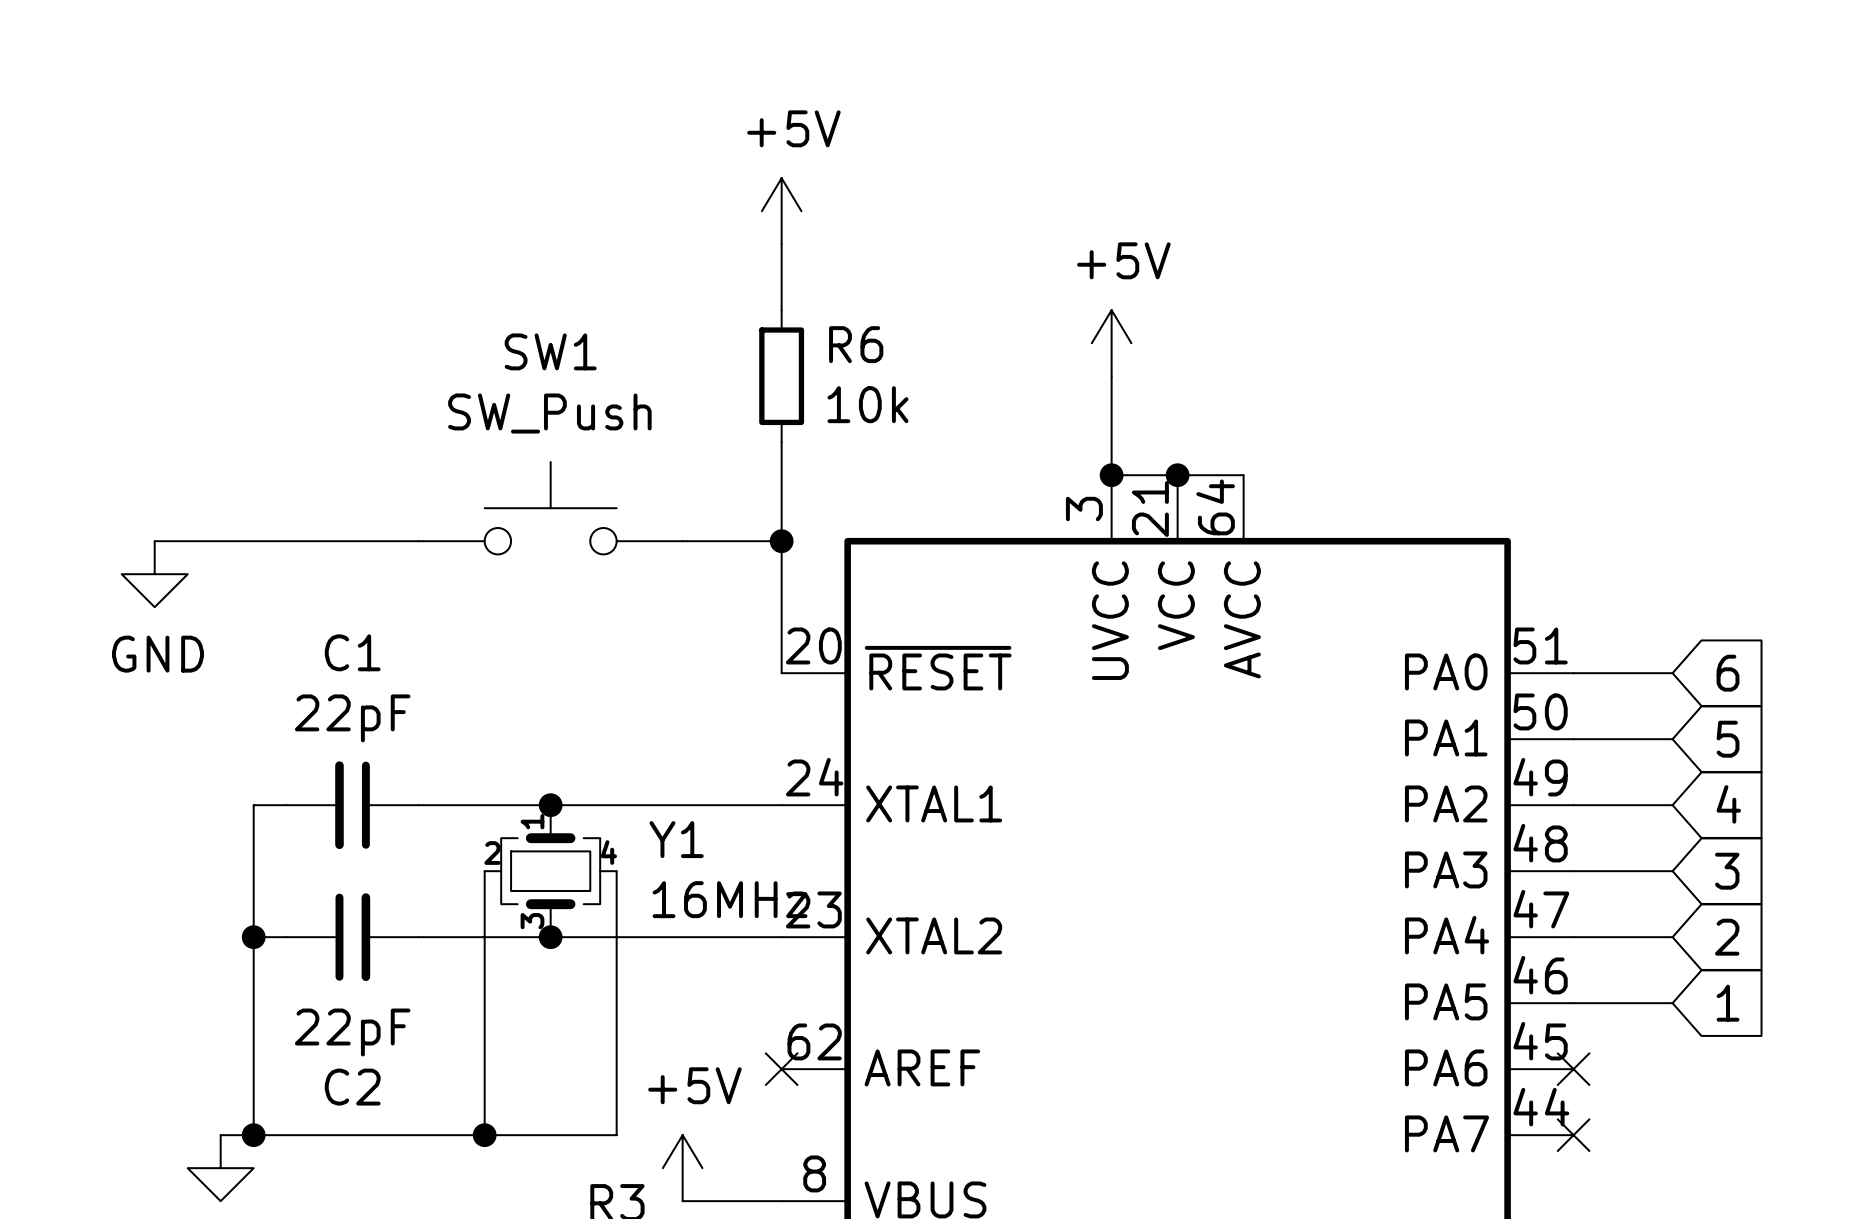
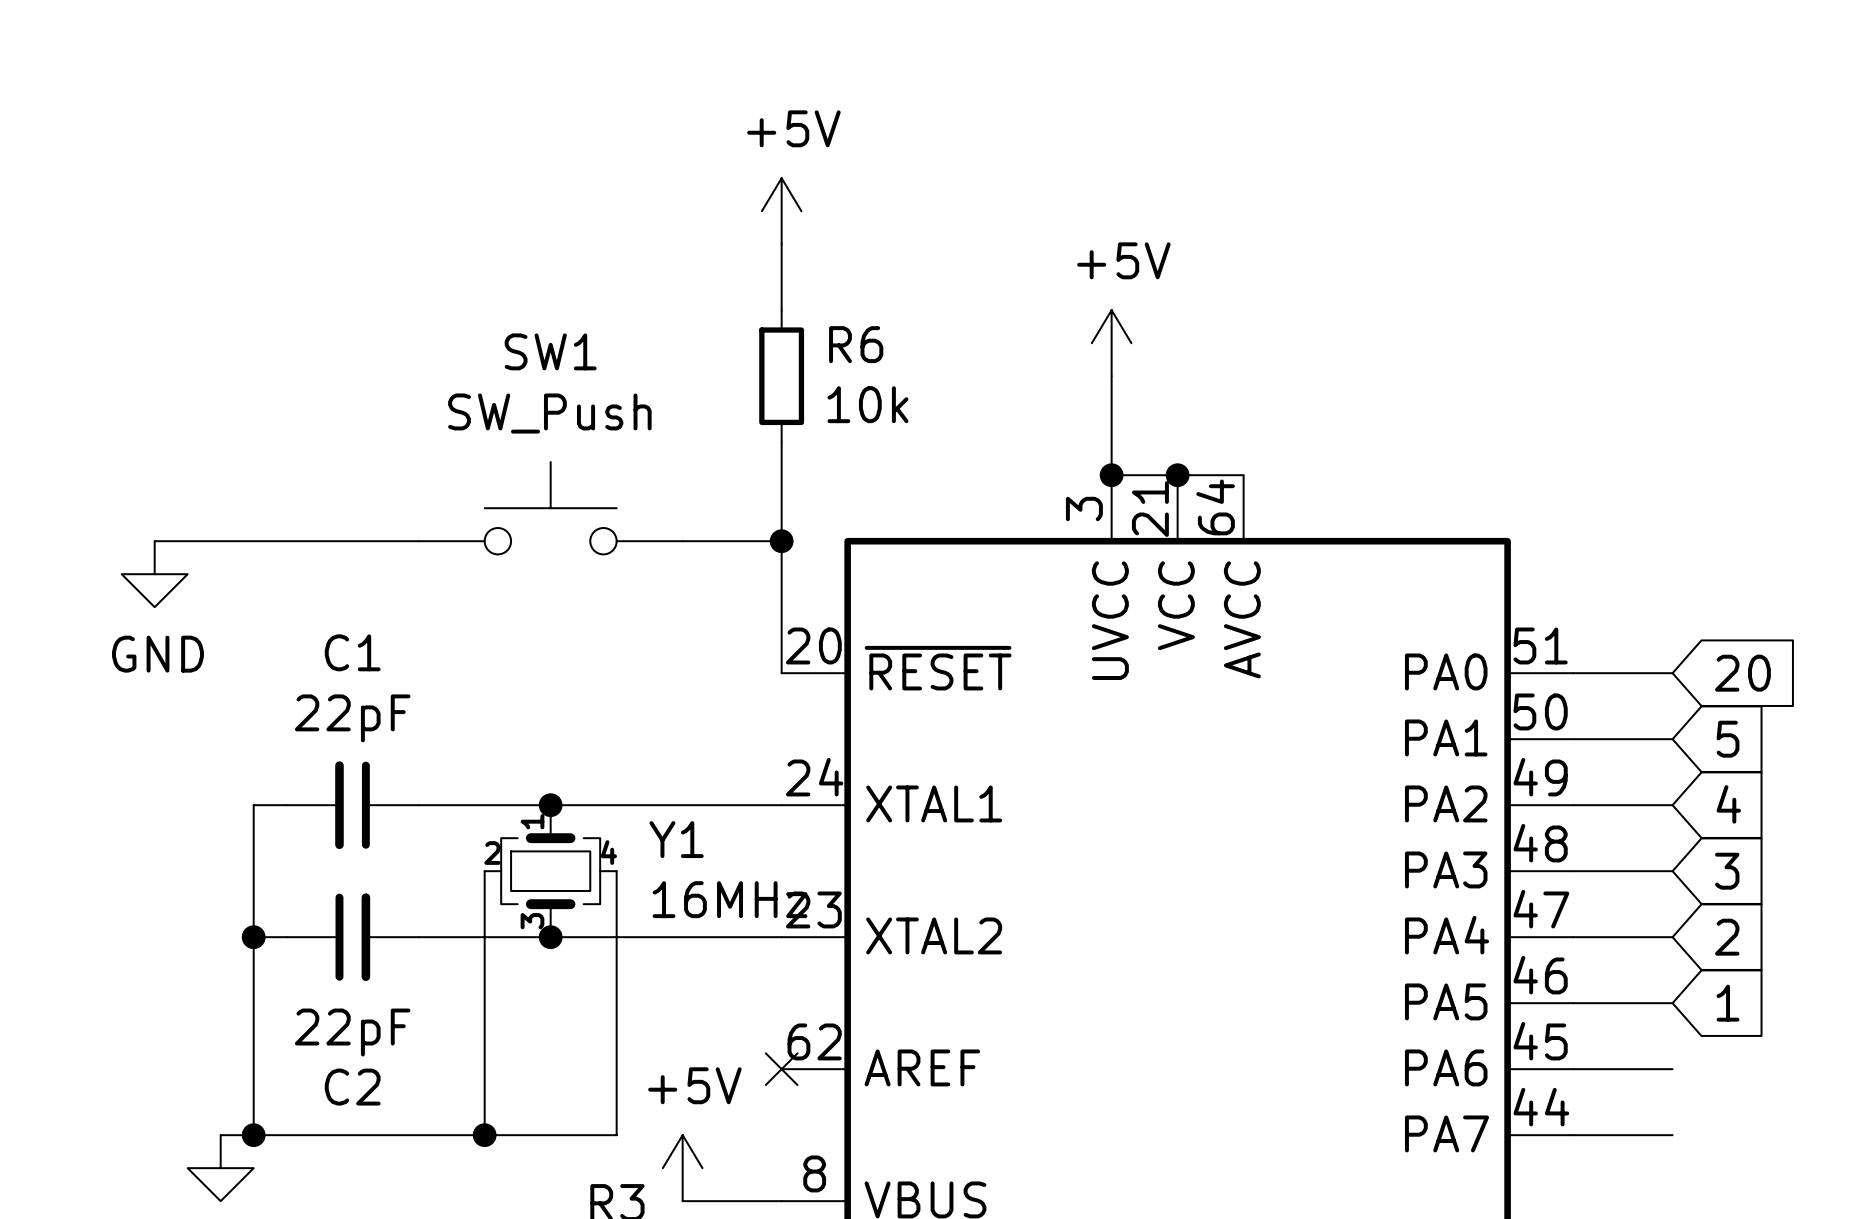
global label: 6 (1728, 673) -> 20 (1742, 673)
wire: none -> (1573, 1069) (1672, 1069)
no-connect mark: (1573, 1069) -> none
wire: none -> (1573, 1135) (1672, 1135)
no-connect mark: (1573, 1135) -> none

